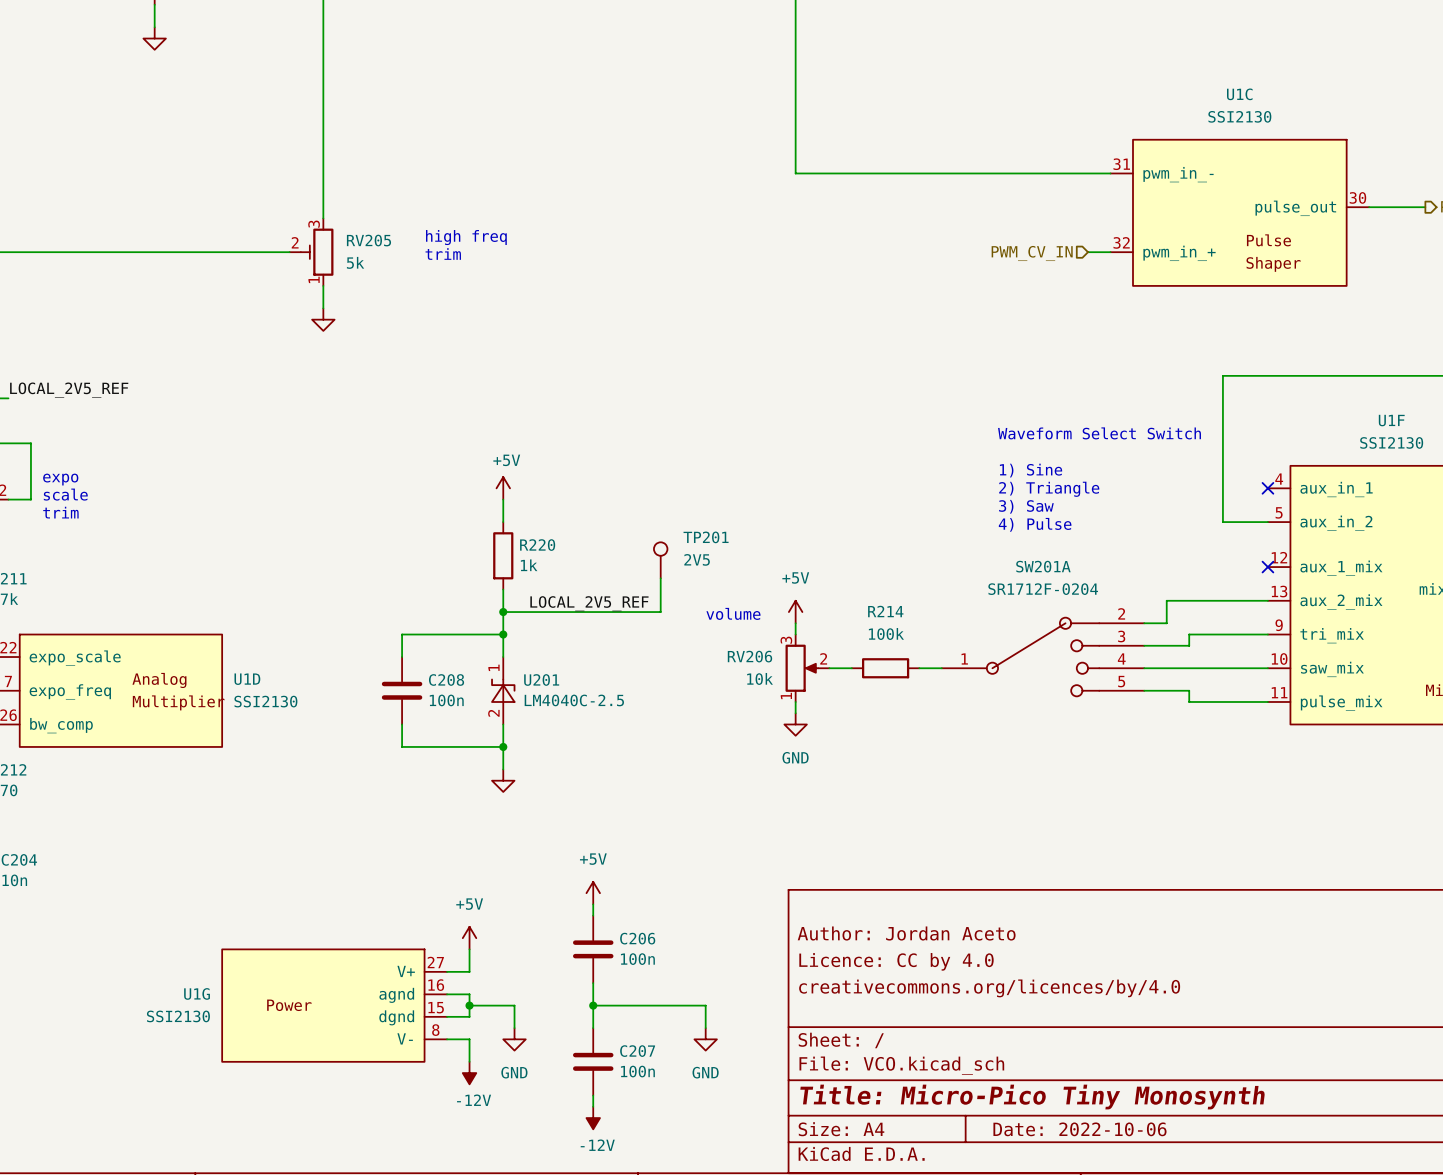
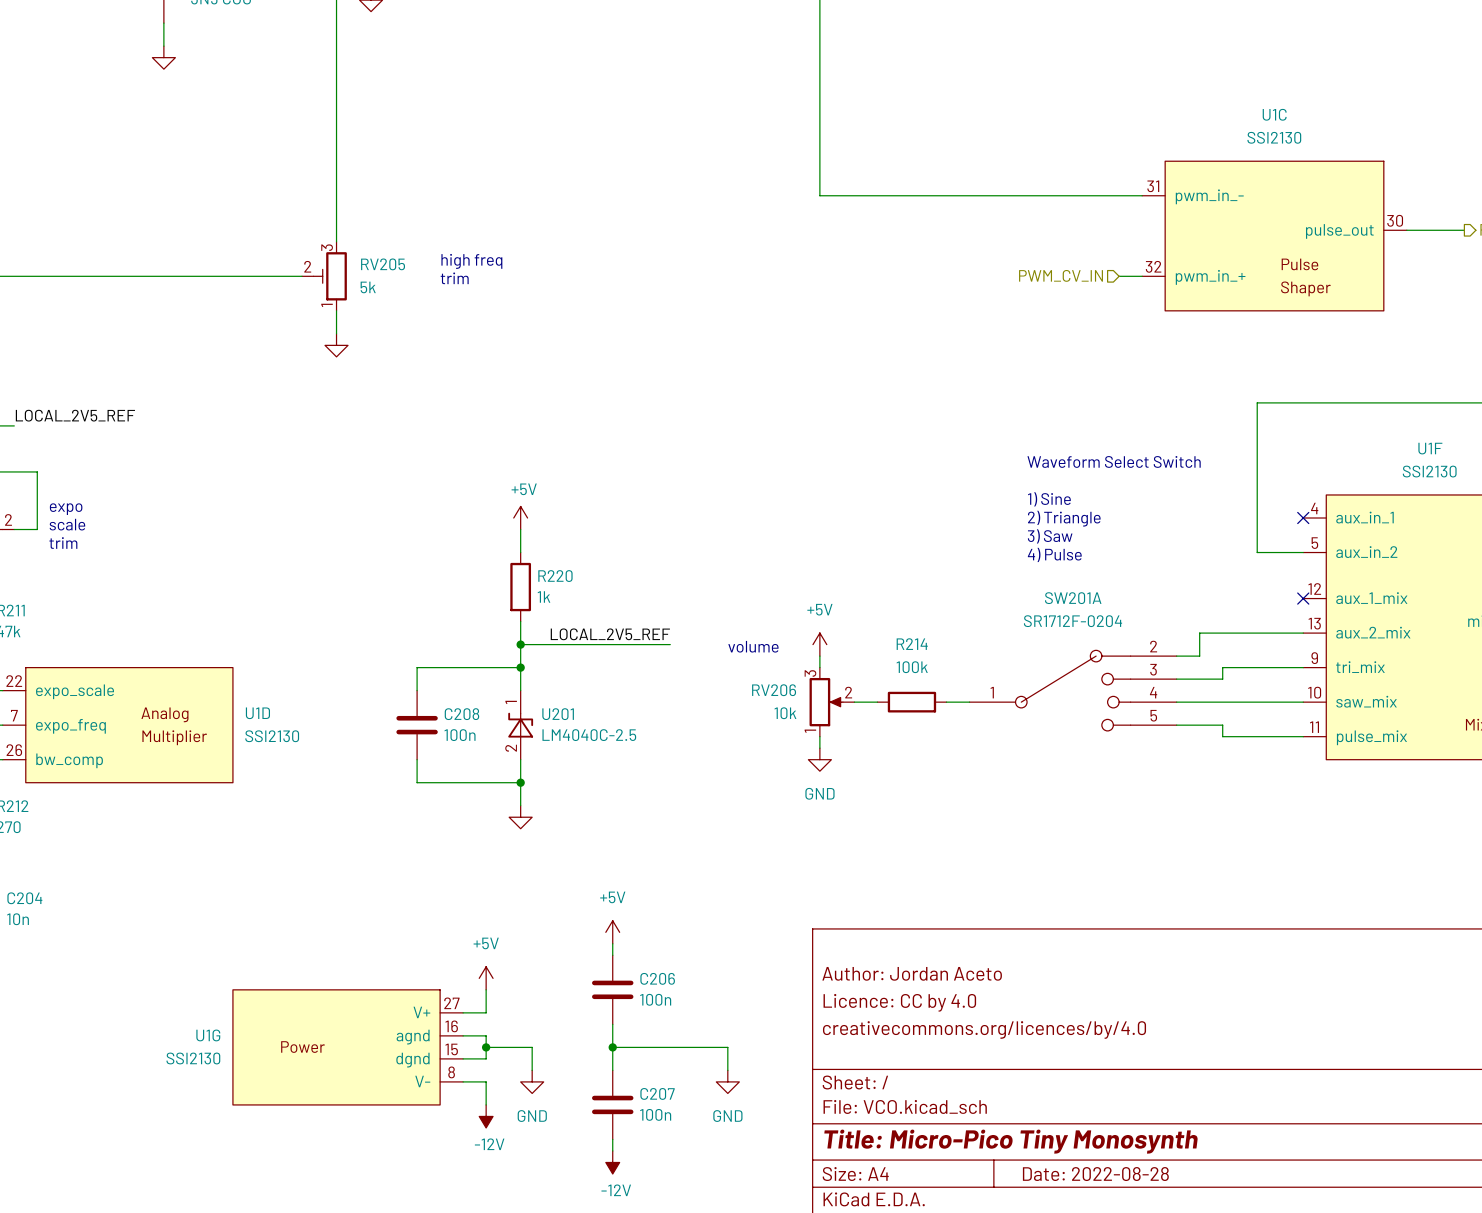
TP201: 2V5 (660, 560) -> none
wire: (660, 578) (660, 612) (649, 612) -> none
title block: Date: 2022-10-06 (1079, 1129) -> Date: 2022-08-28 (1095, 1174)

